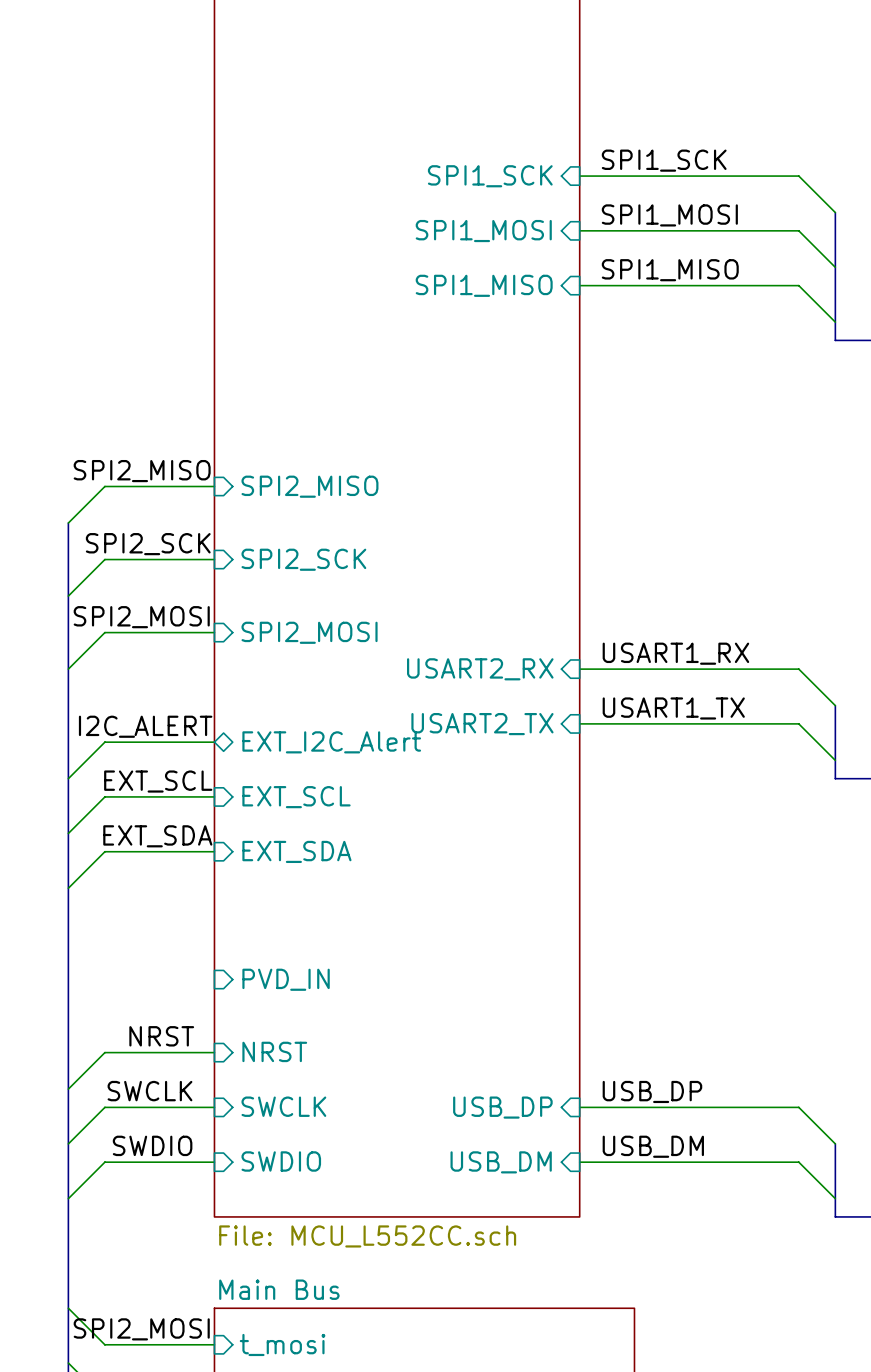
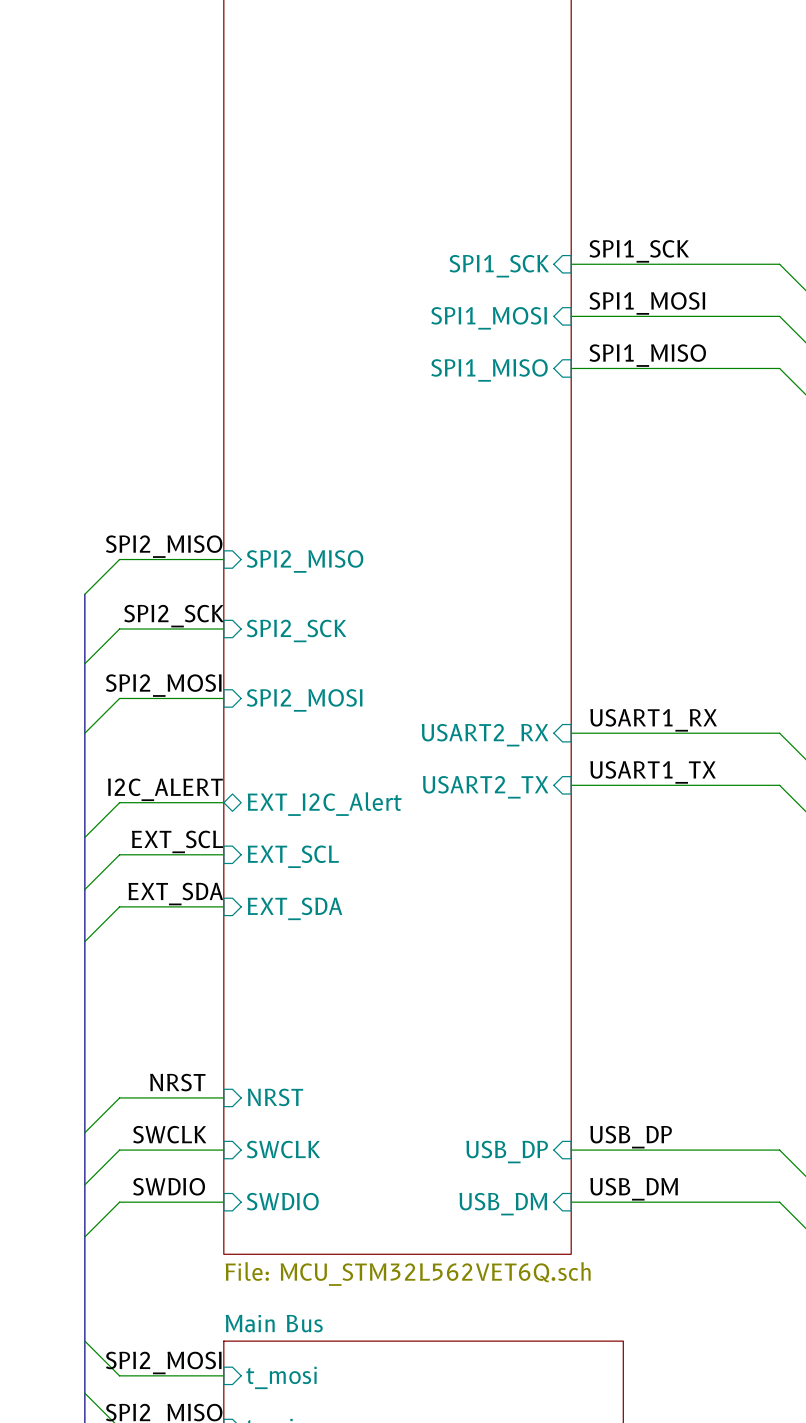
sheet pin: PVD_IN (286, 979) -> none
sheet value: File: MCU_L552CC.sch (367, 1236) -> File: MCU_STM32L562VET6Q.sch (408, 1274)

